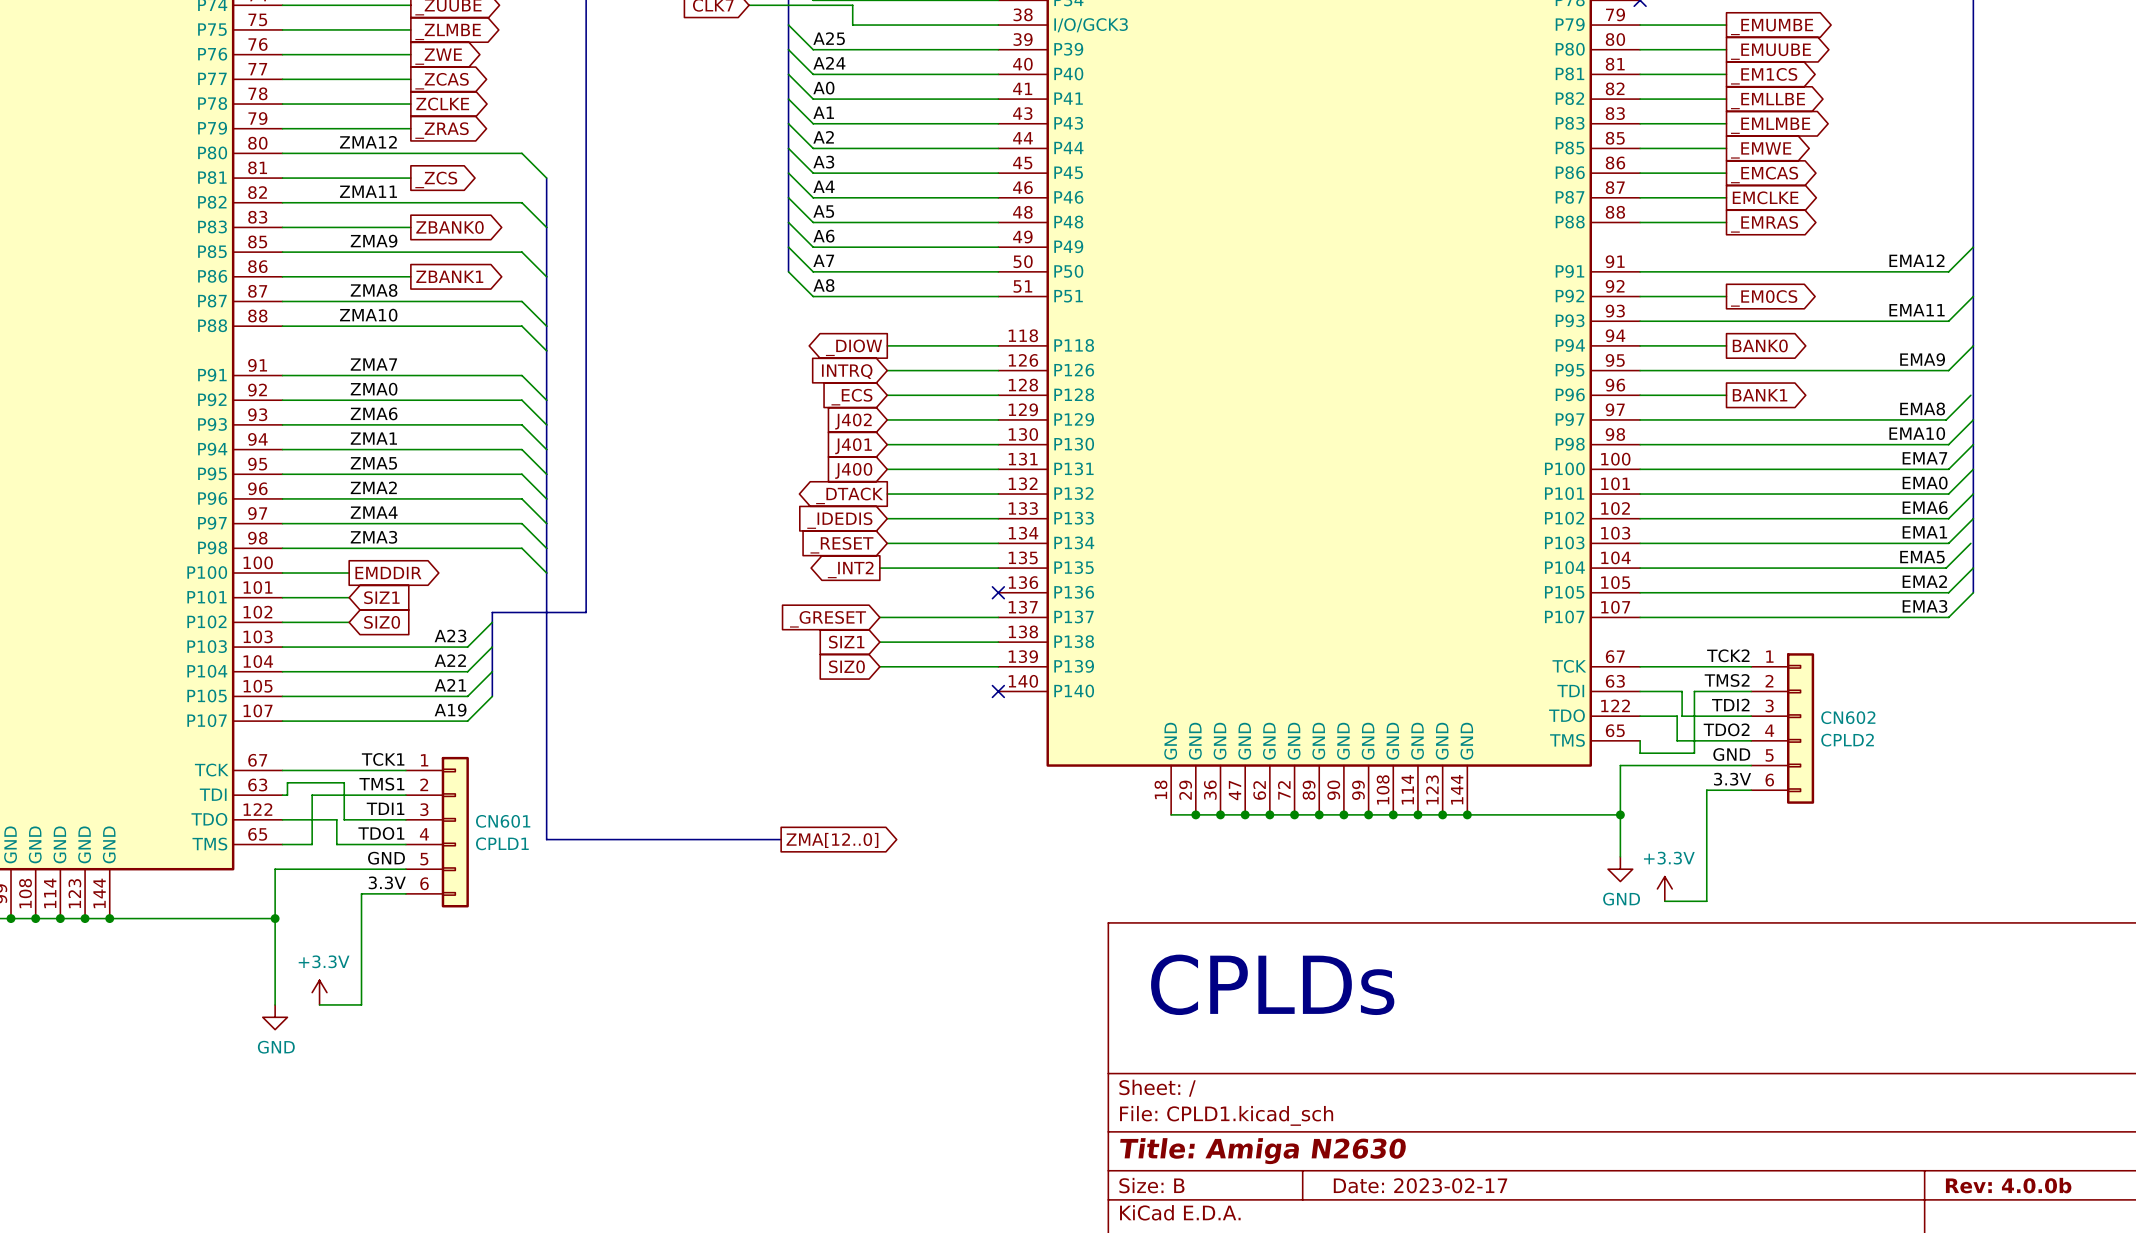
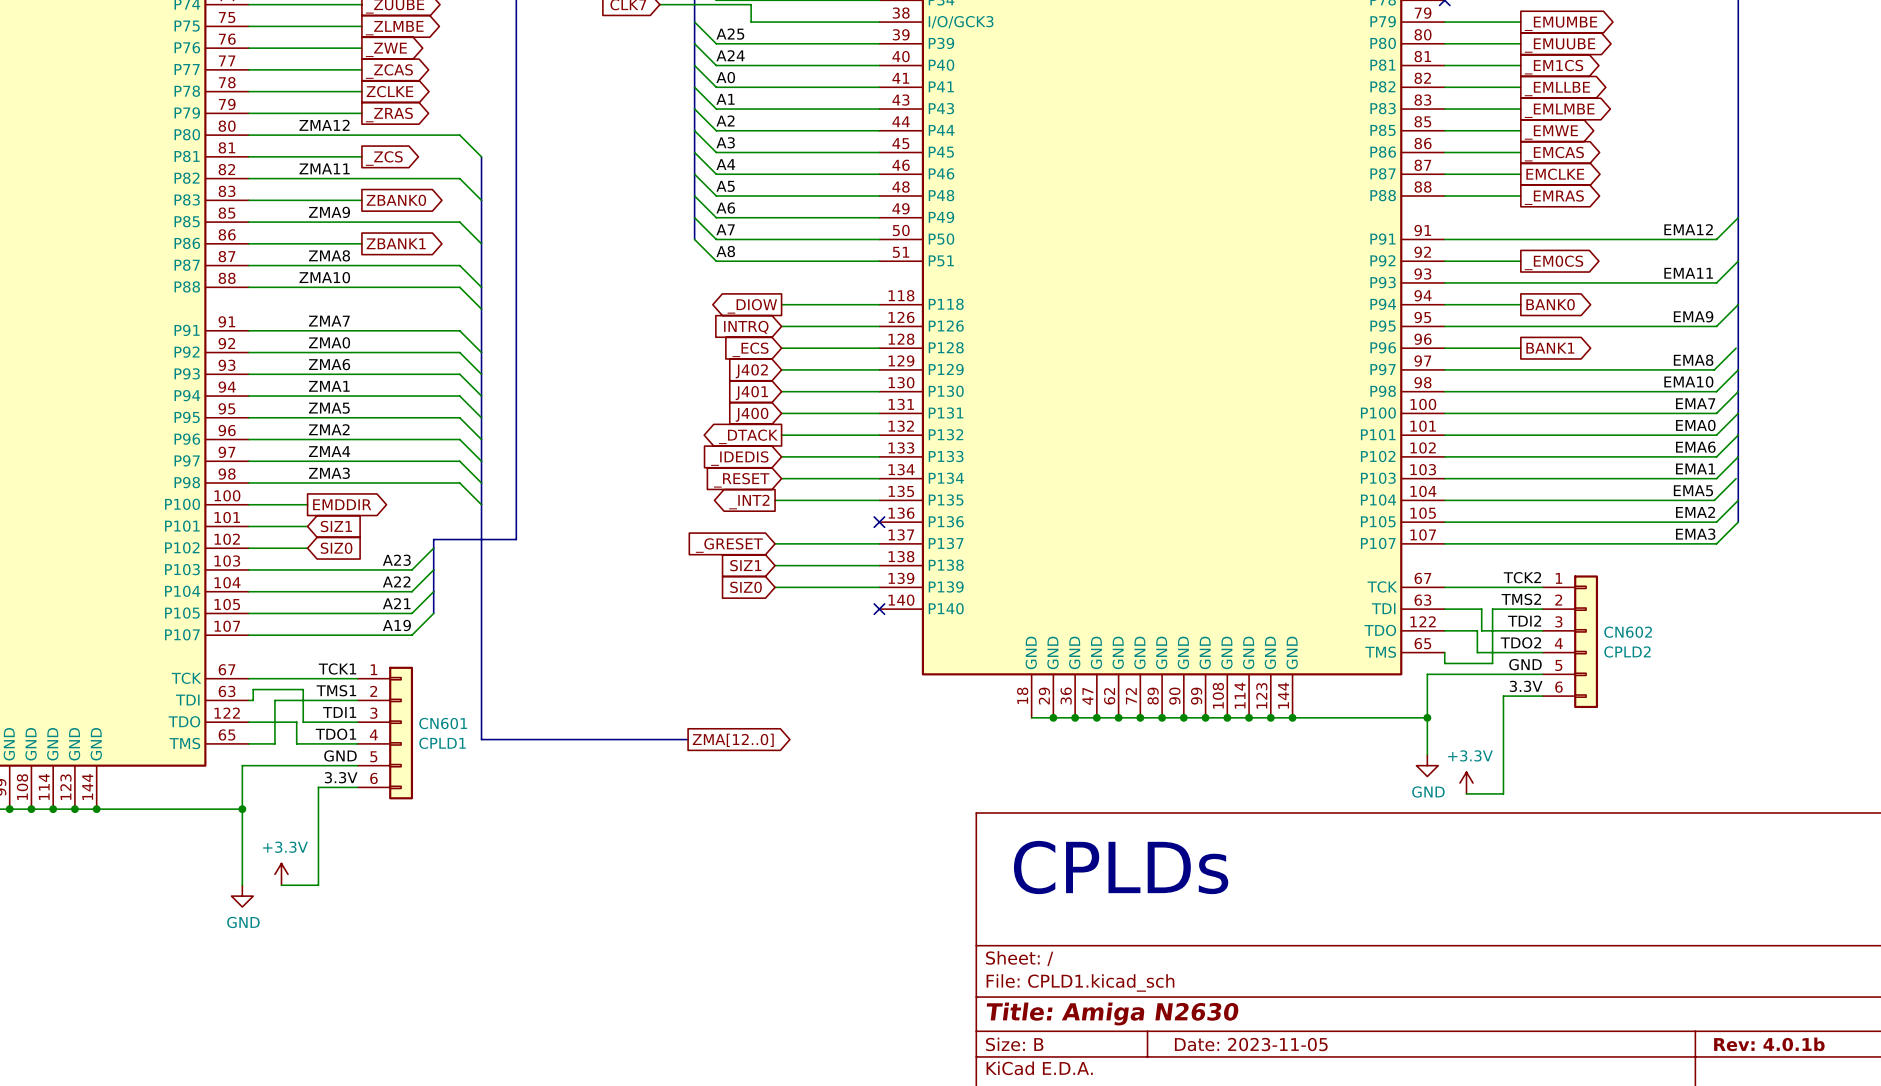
title block: Date: 2023-02-17 (1420, 1185) -> Date: 2023-11-05 (1251, 1044)
title block: Rev: 4.0.0b (2008, 1185) -> Rev: 4.0.1b (1769, 1044)

